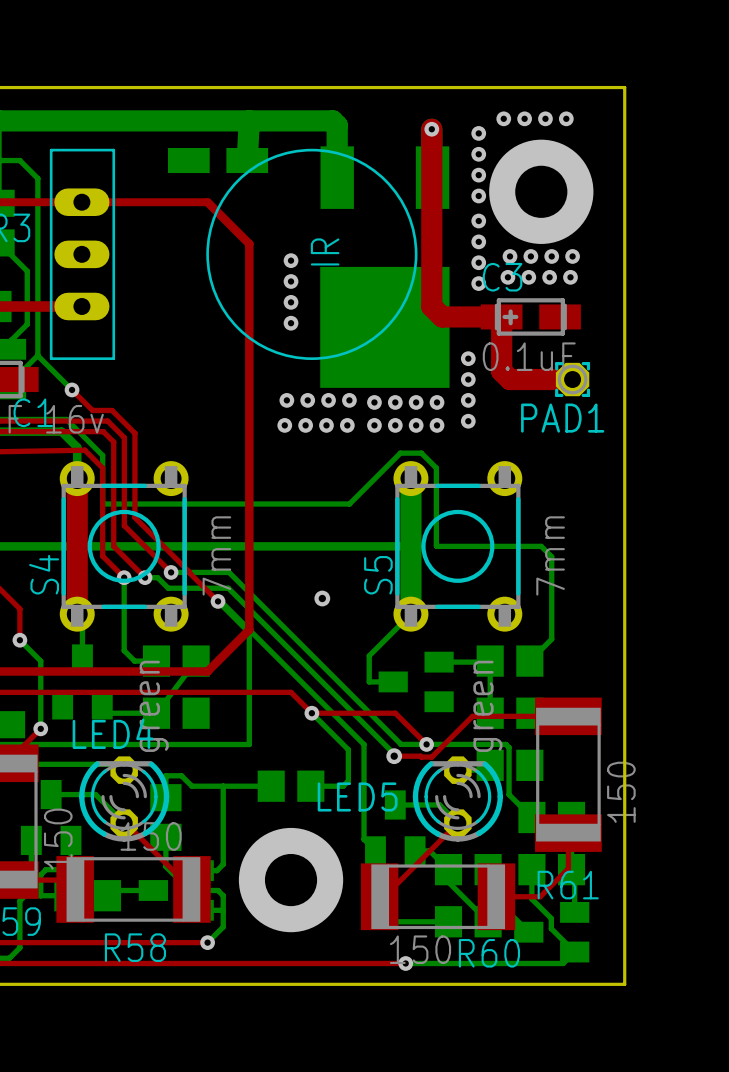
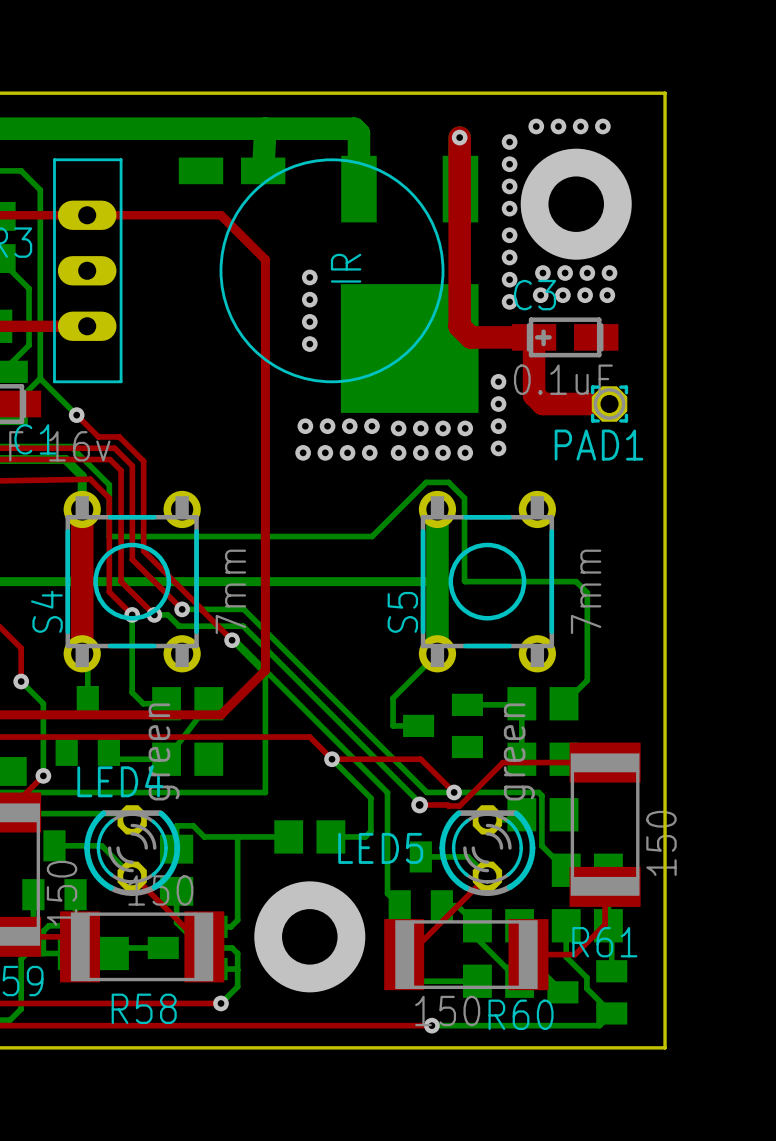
via: (322, 598) -> none

